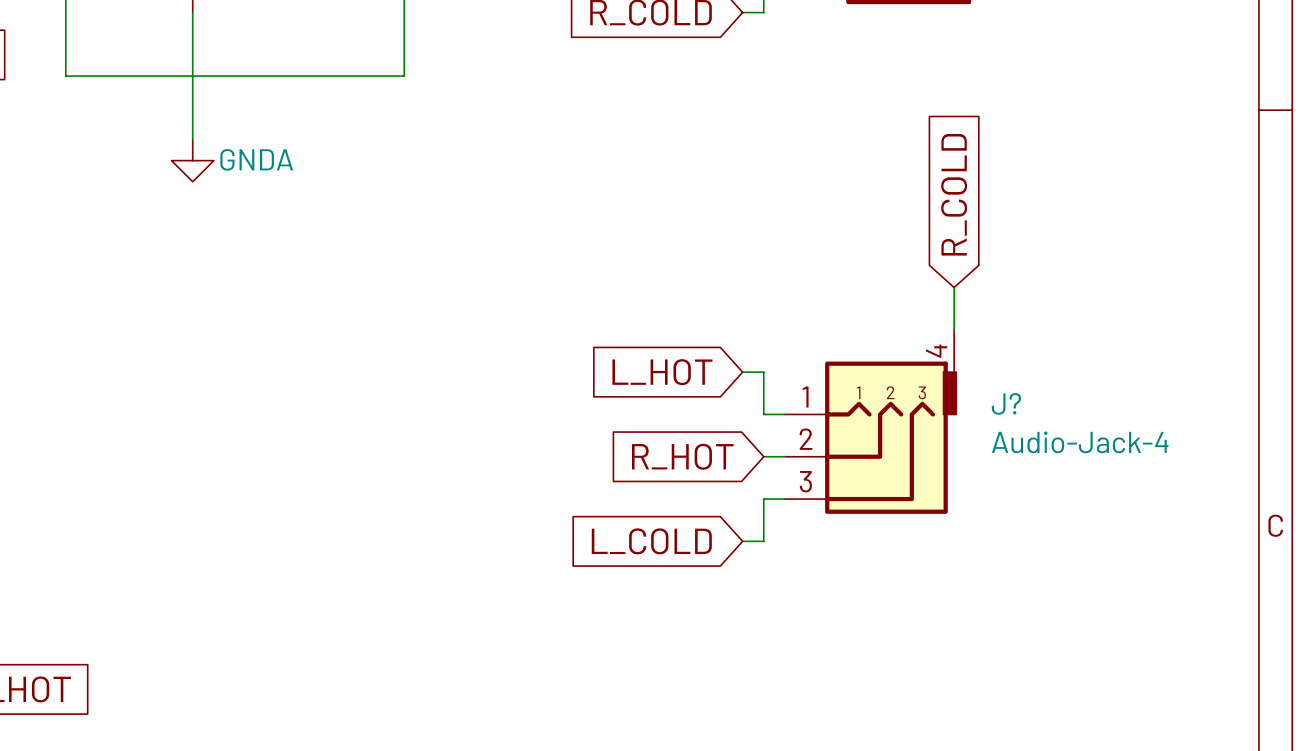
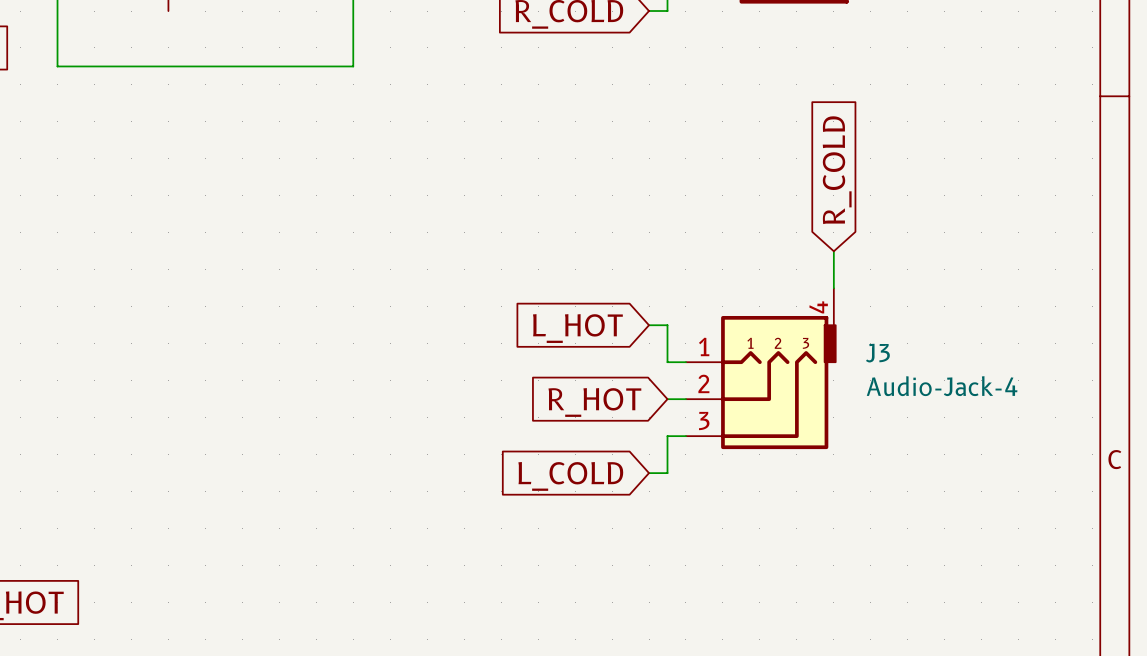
wire: (192, 12) (192, 139) -> none
power symbol: GNDA (192, 160) -> none
J? name: J? (1006, 403) -> J3 (877, 353)

